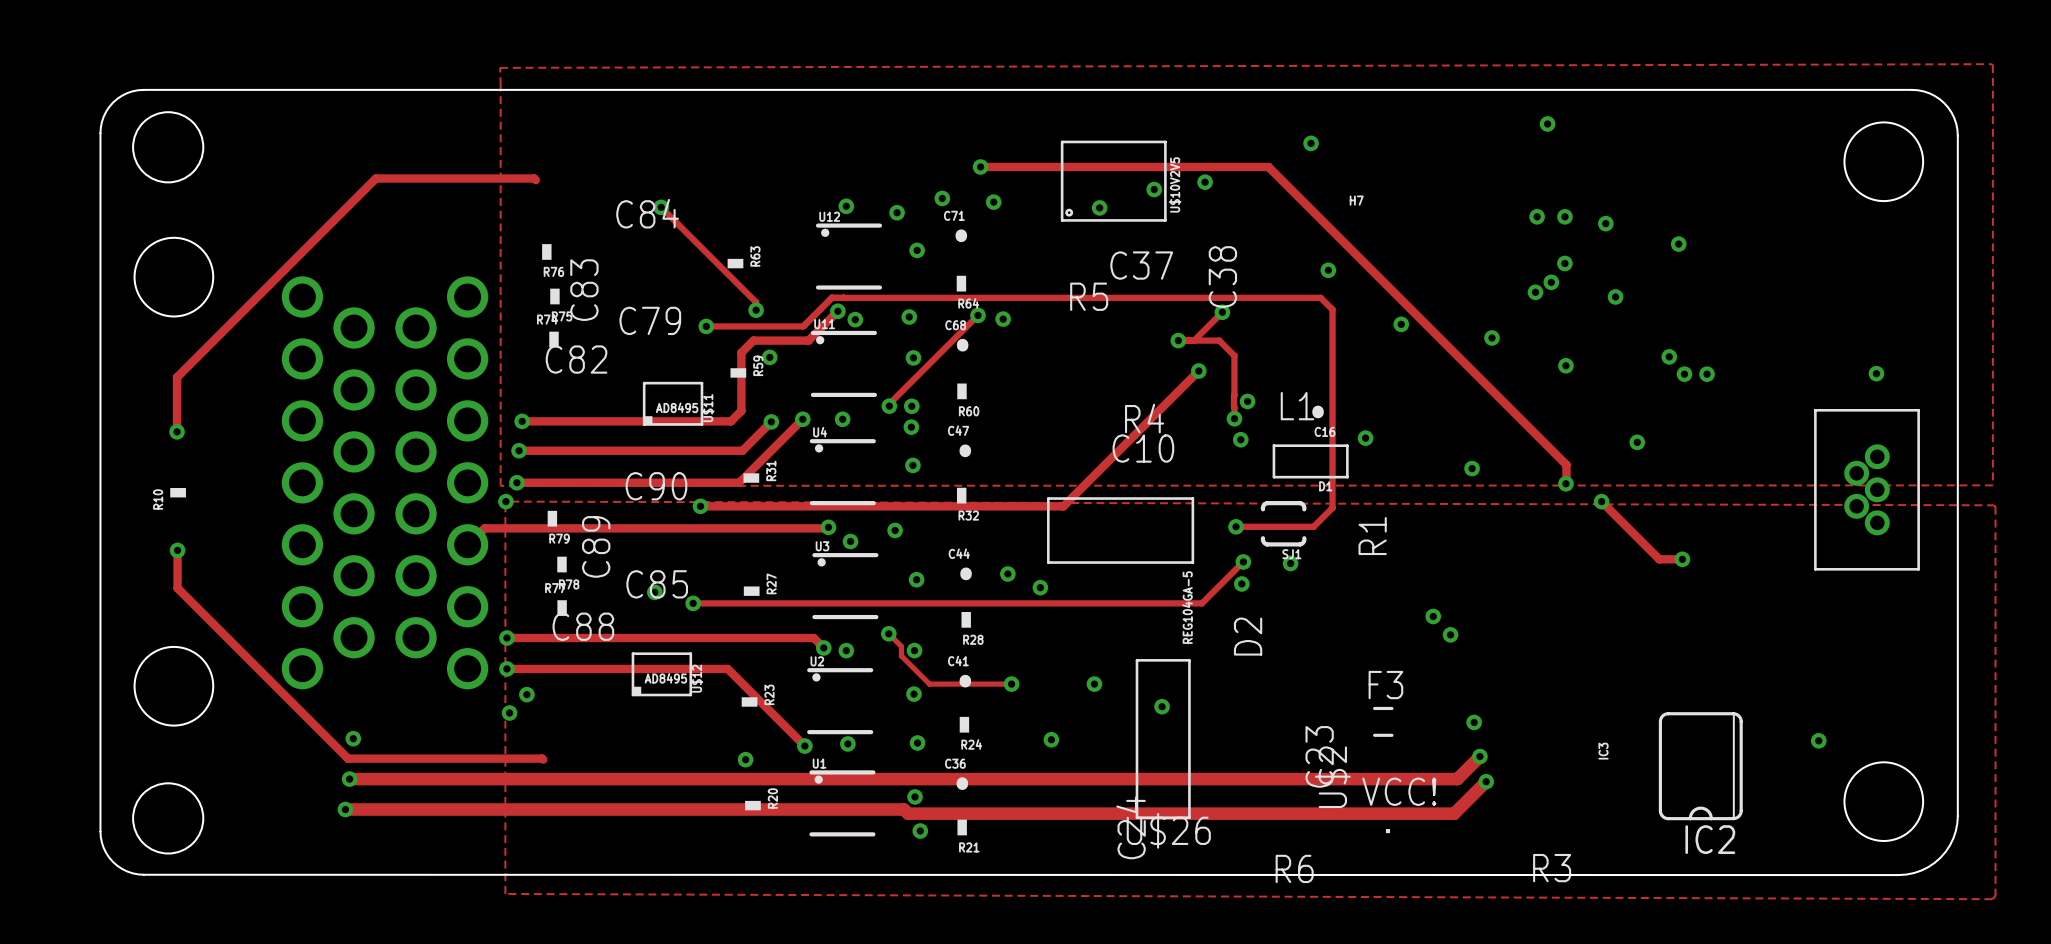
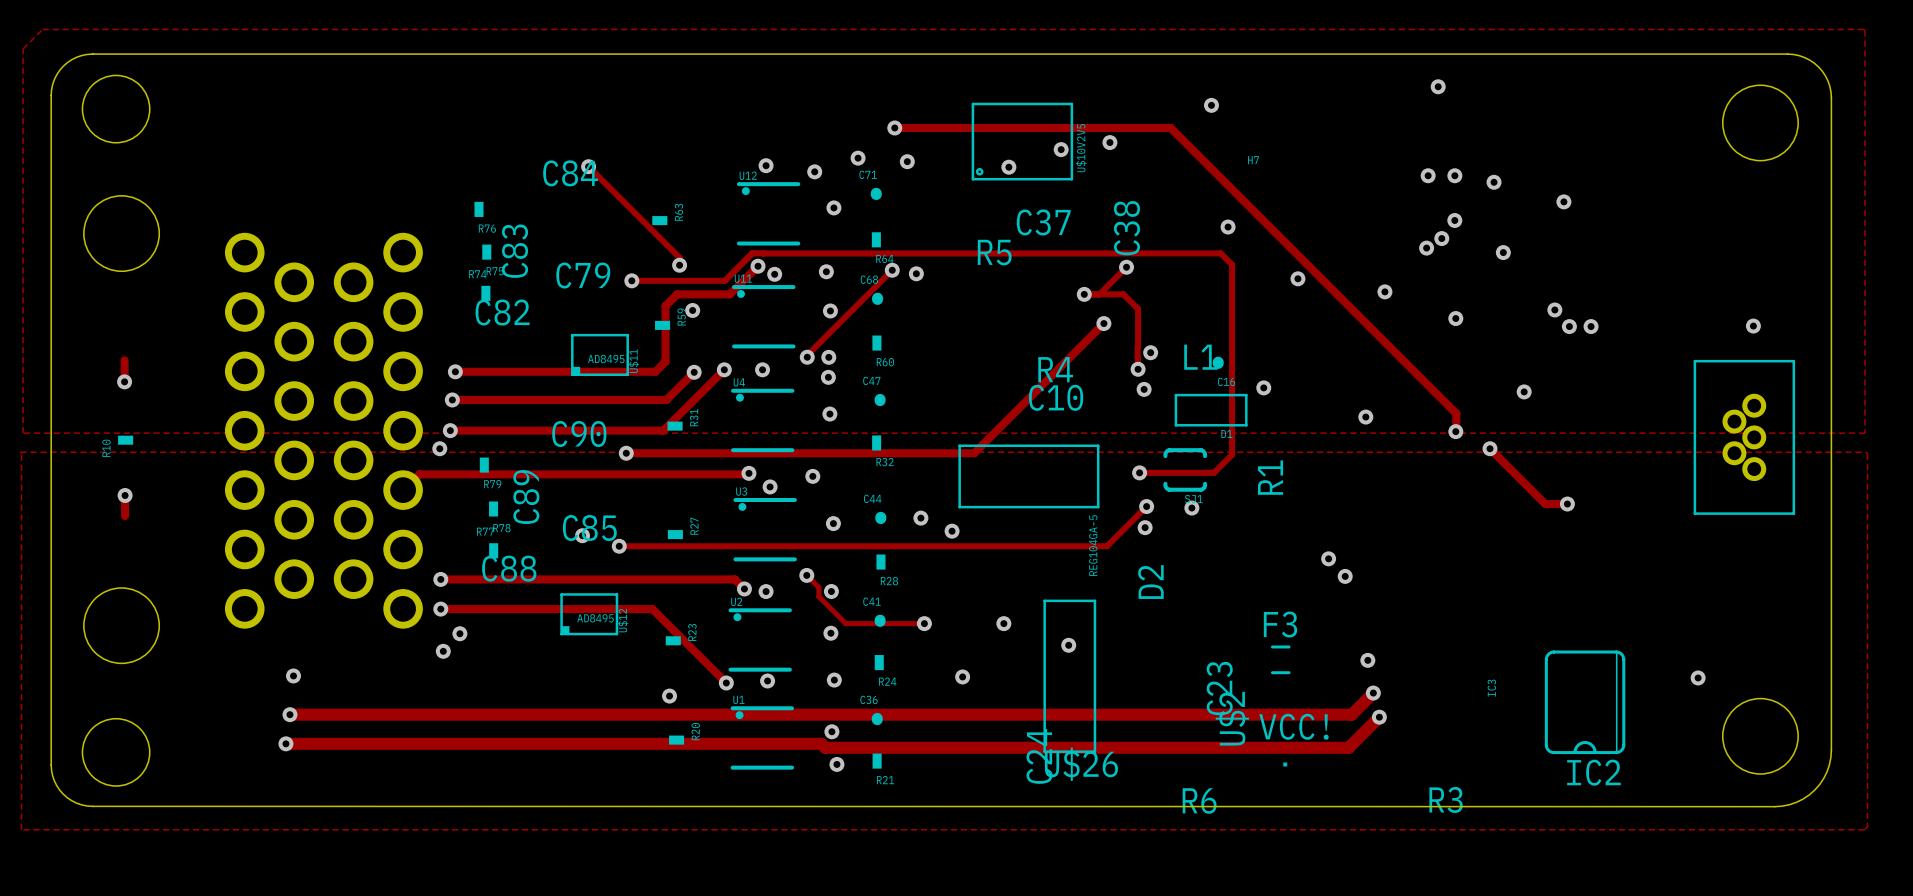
zone outline: (1991, 64) (500, 67) (500, 485) (1992, 485) -> (1864, 29) (42, 29) (23, 49) (23, 433) (1865, 433)
track: (535, 180) (534, 178) (375, 178) (177, 377) (177, 409) -> none
zone outline: (1993, 505) (505, 501) (505, 893) (1992, 899) -> (1866, 452) (20, 452) (21, 829) (1864, 829)
track: (177, 571) (177, 588) (348, 758) (543, 759) -> none

